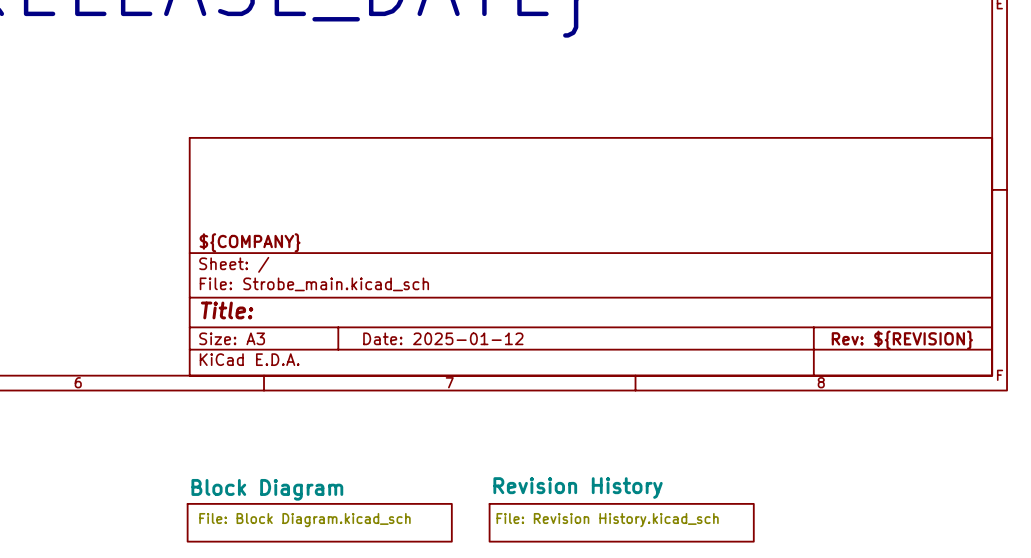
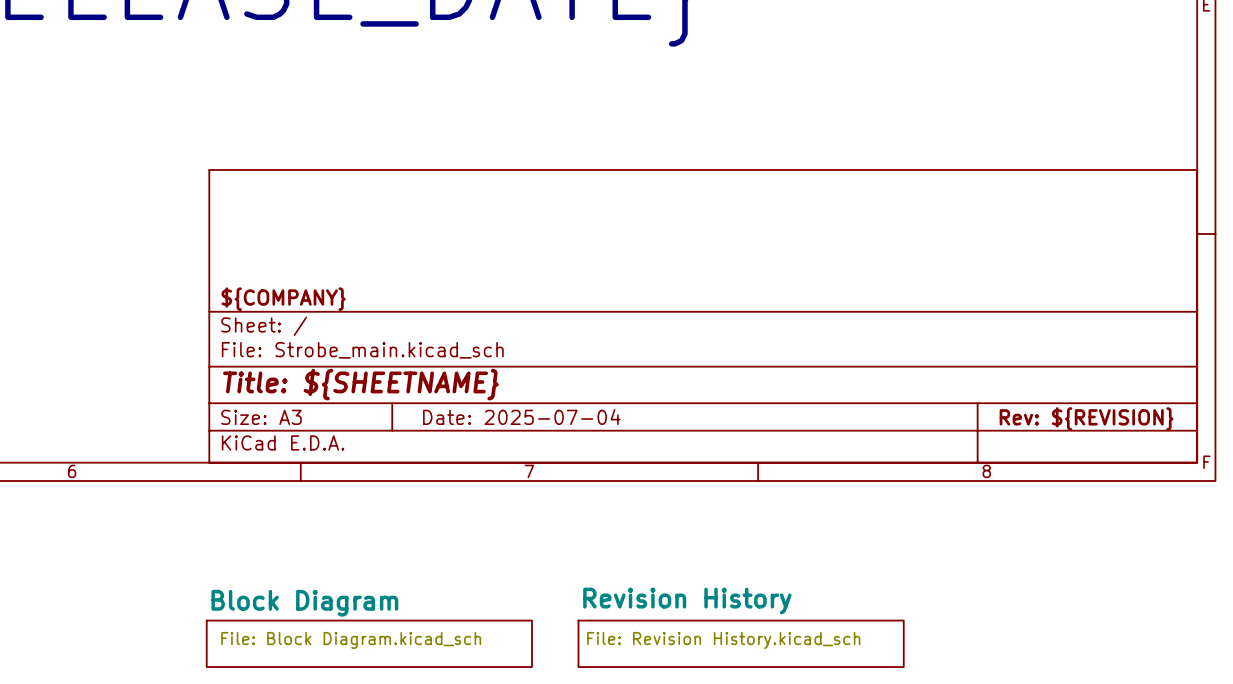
title block: Title: (227, 310) -> Title: ${SHEETNAME} (360, 384)
title block: Date: 2025-01-12 (443, 338) -> Date: 2025-07-04 (521, 417)

